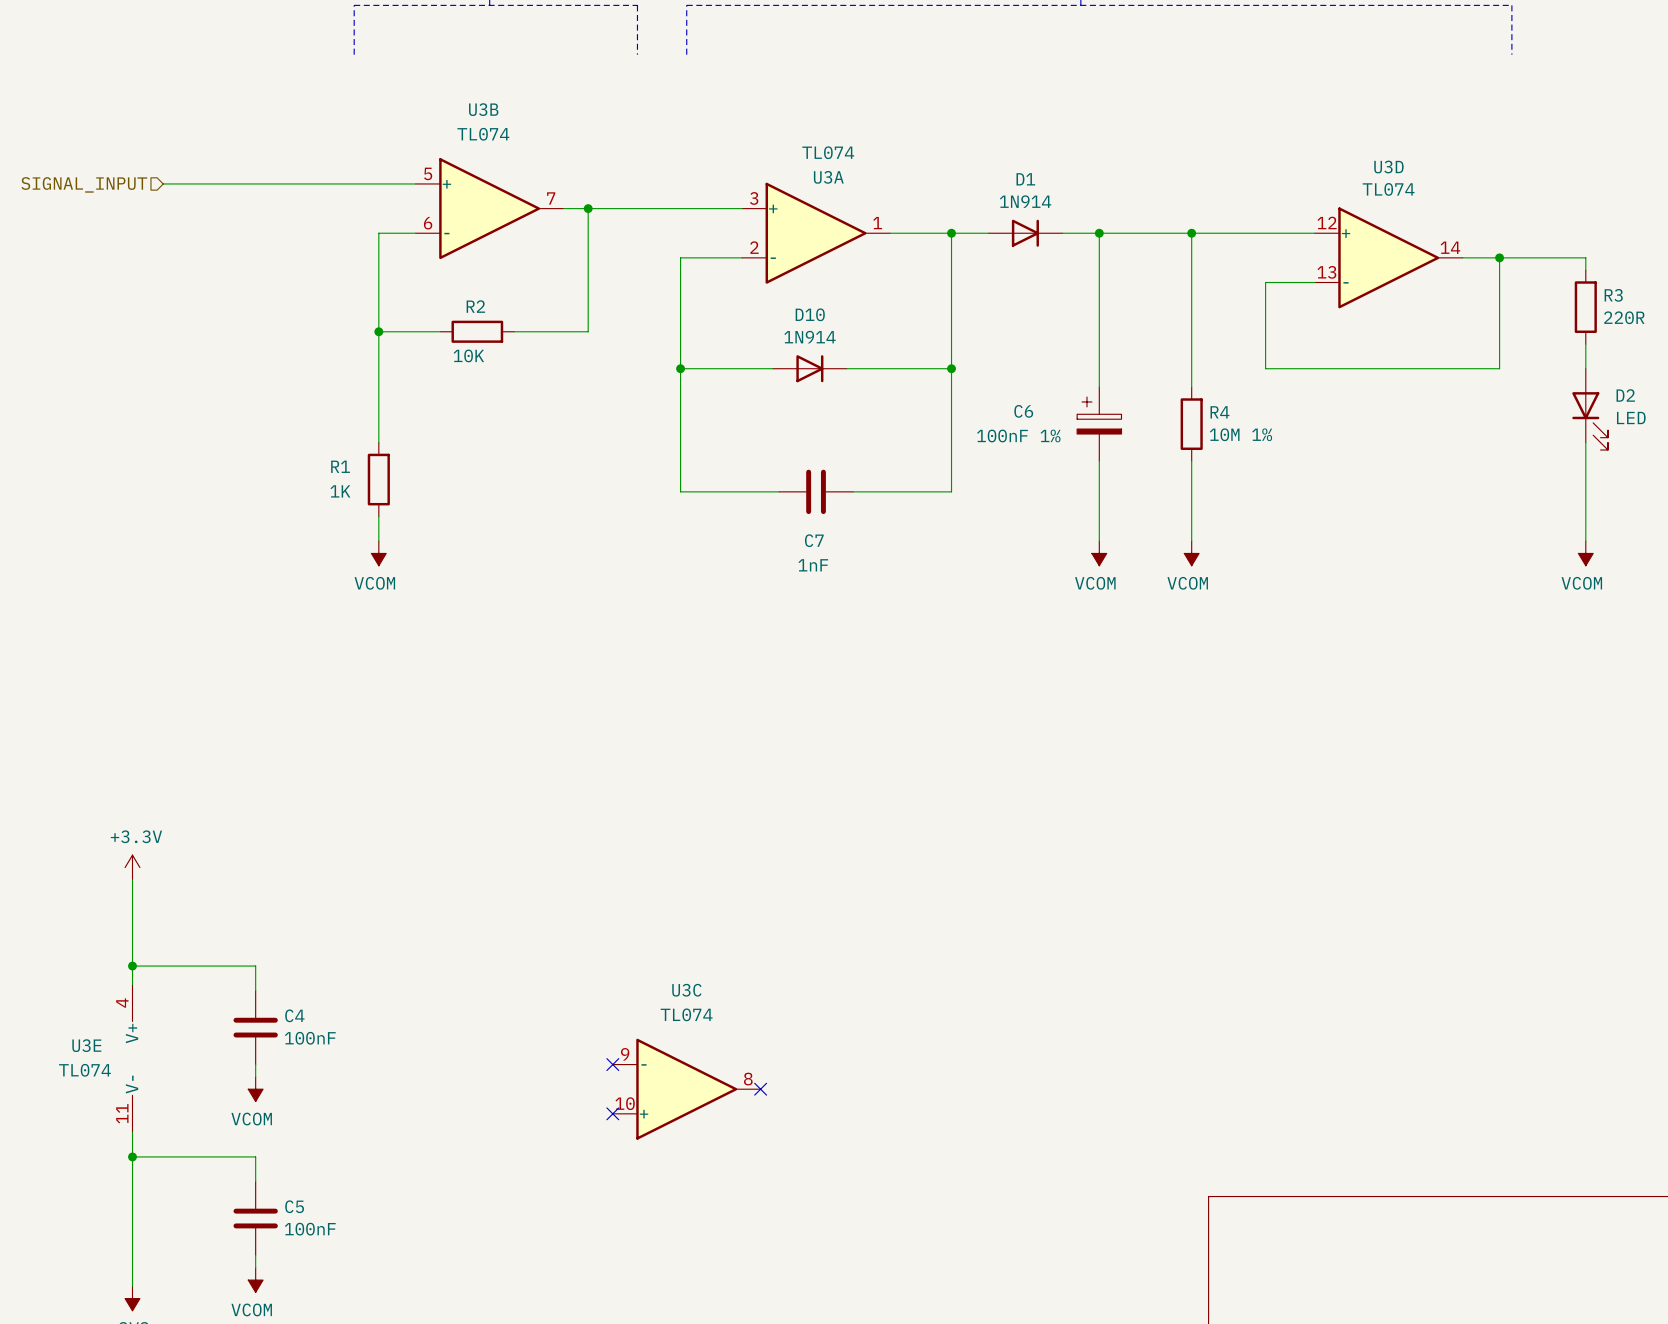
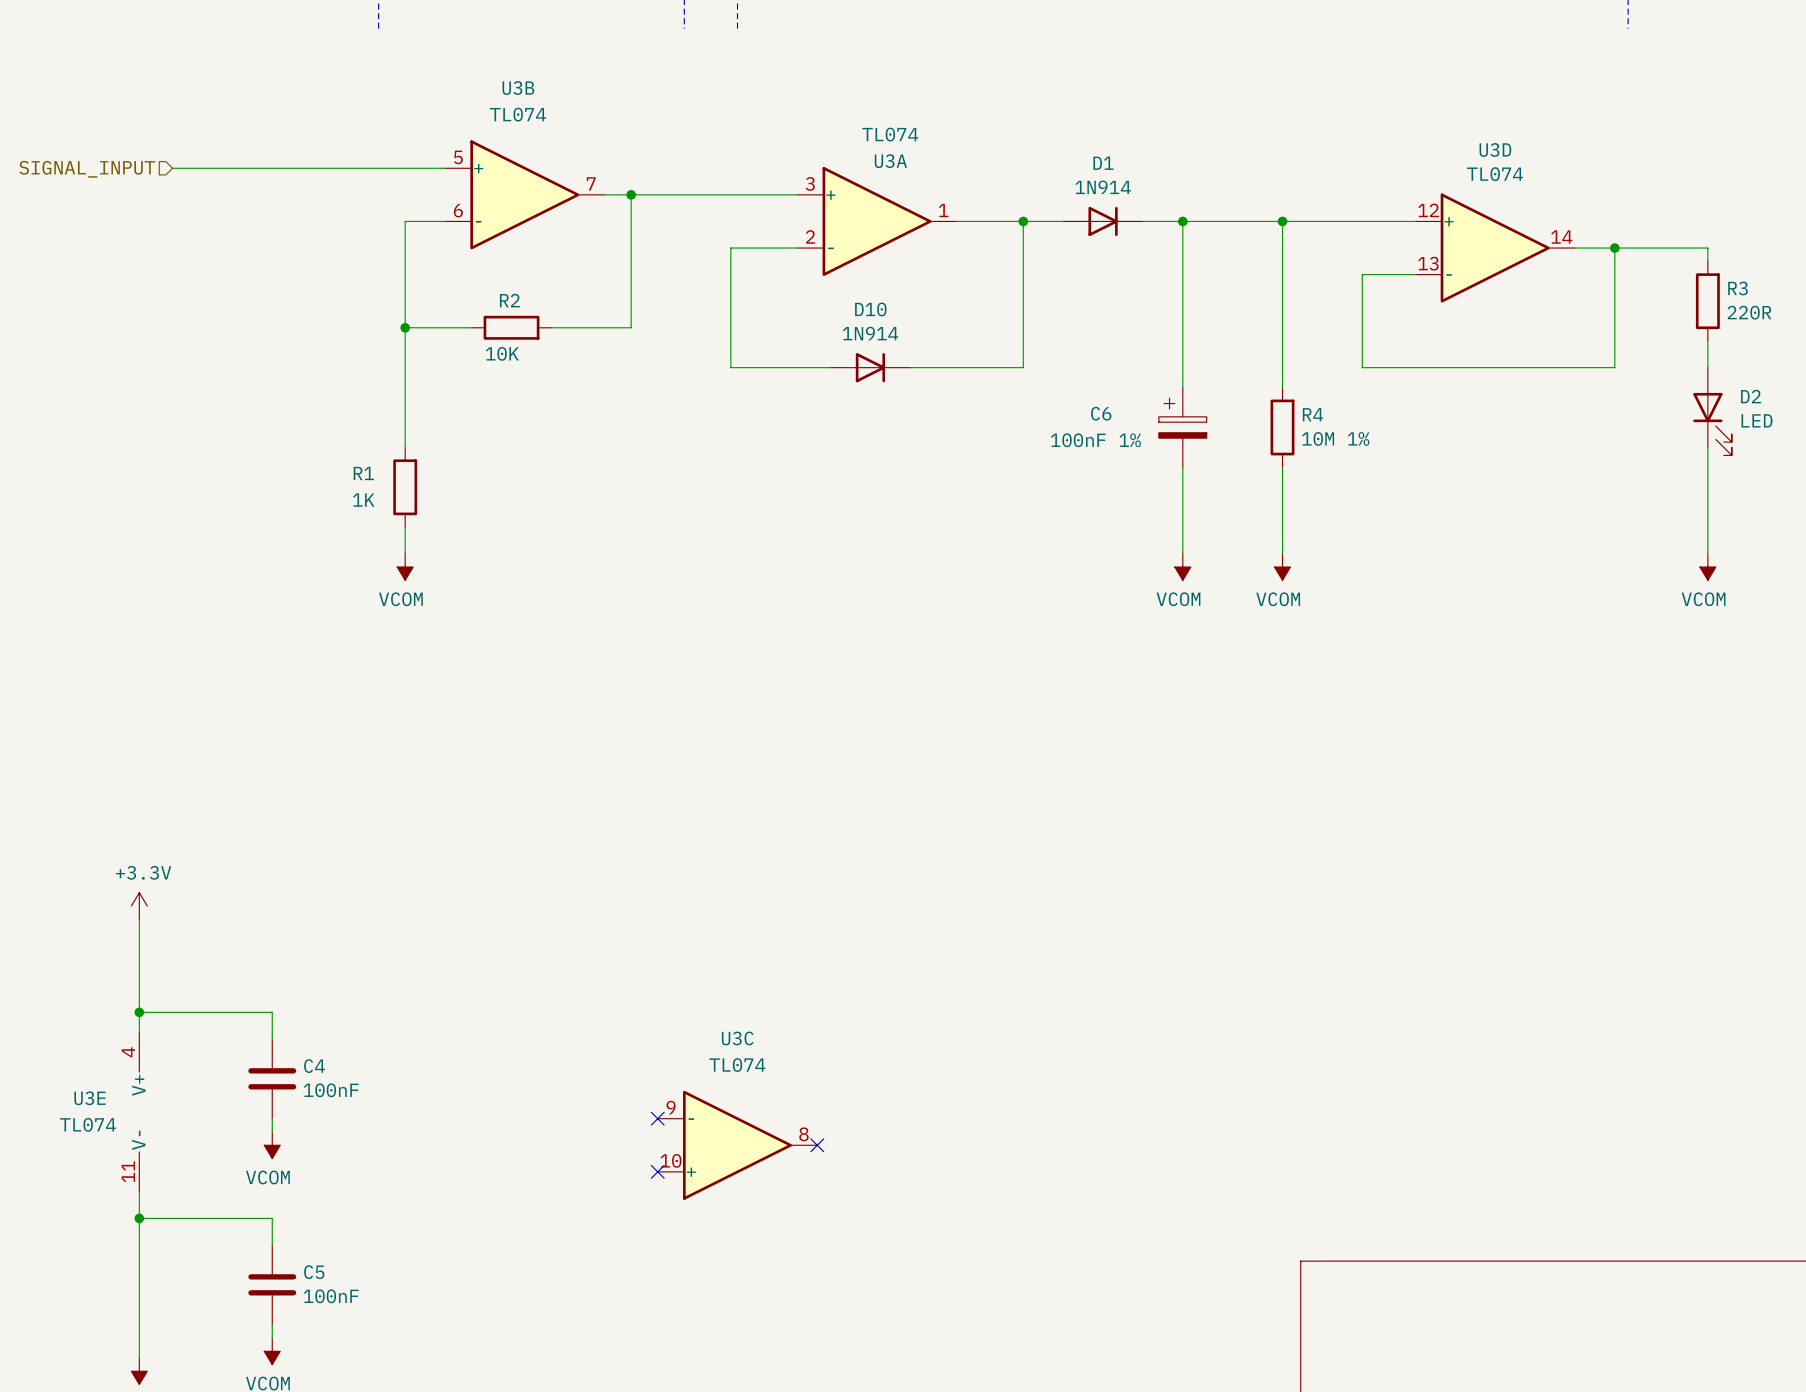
wire: (680, 368) (680, 491) (779, 491) -> none
junction: (680, 368) -> none
wire: (951, 368) (951, 491) (852, 491) -> none
junction: (951, 368) -> none
C7: 1nF (816, 491) -> none

